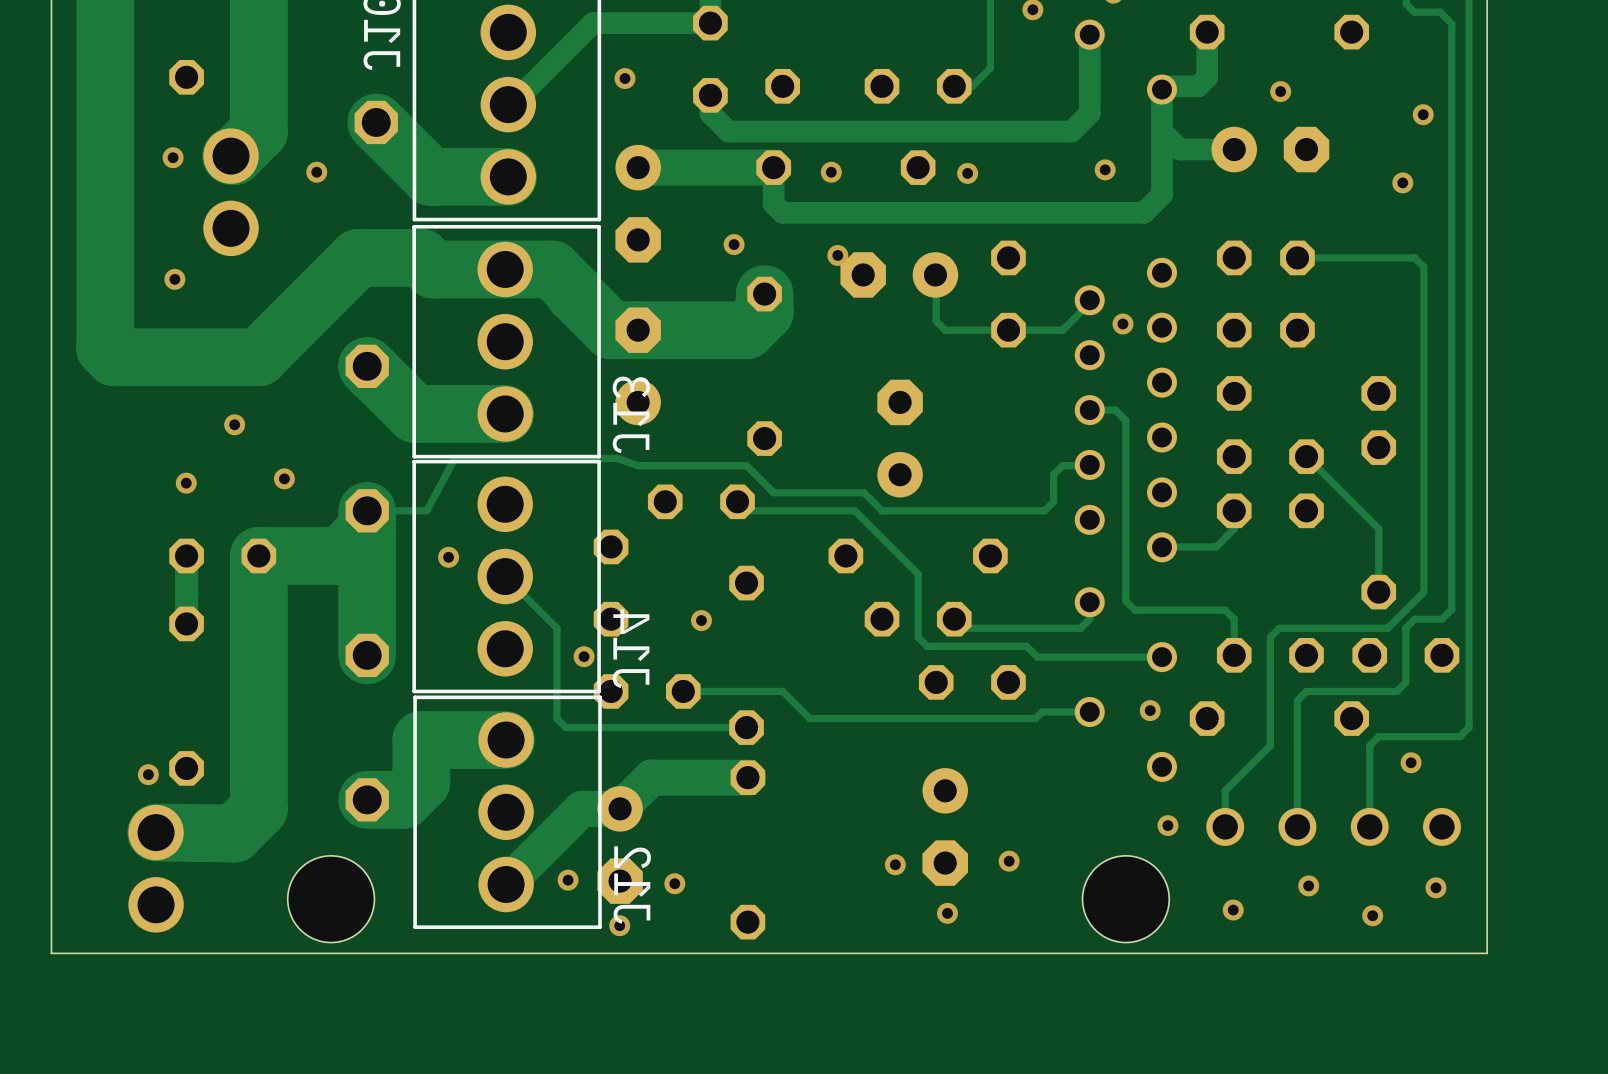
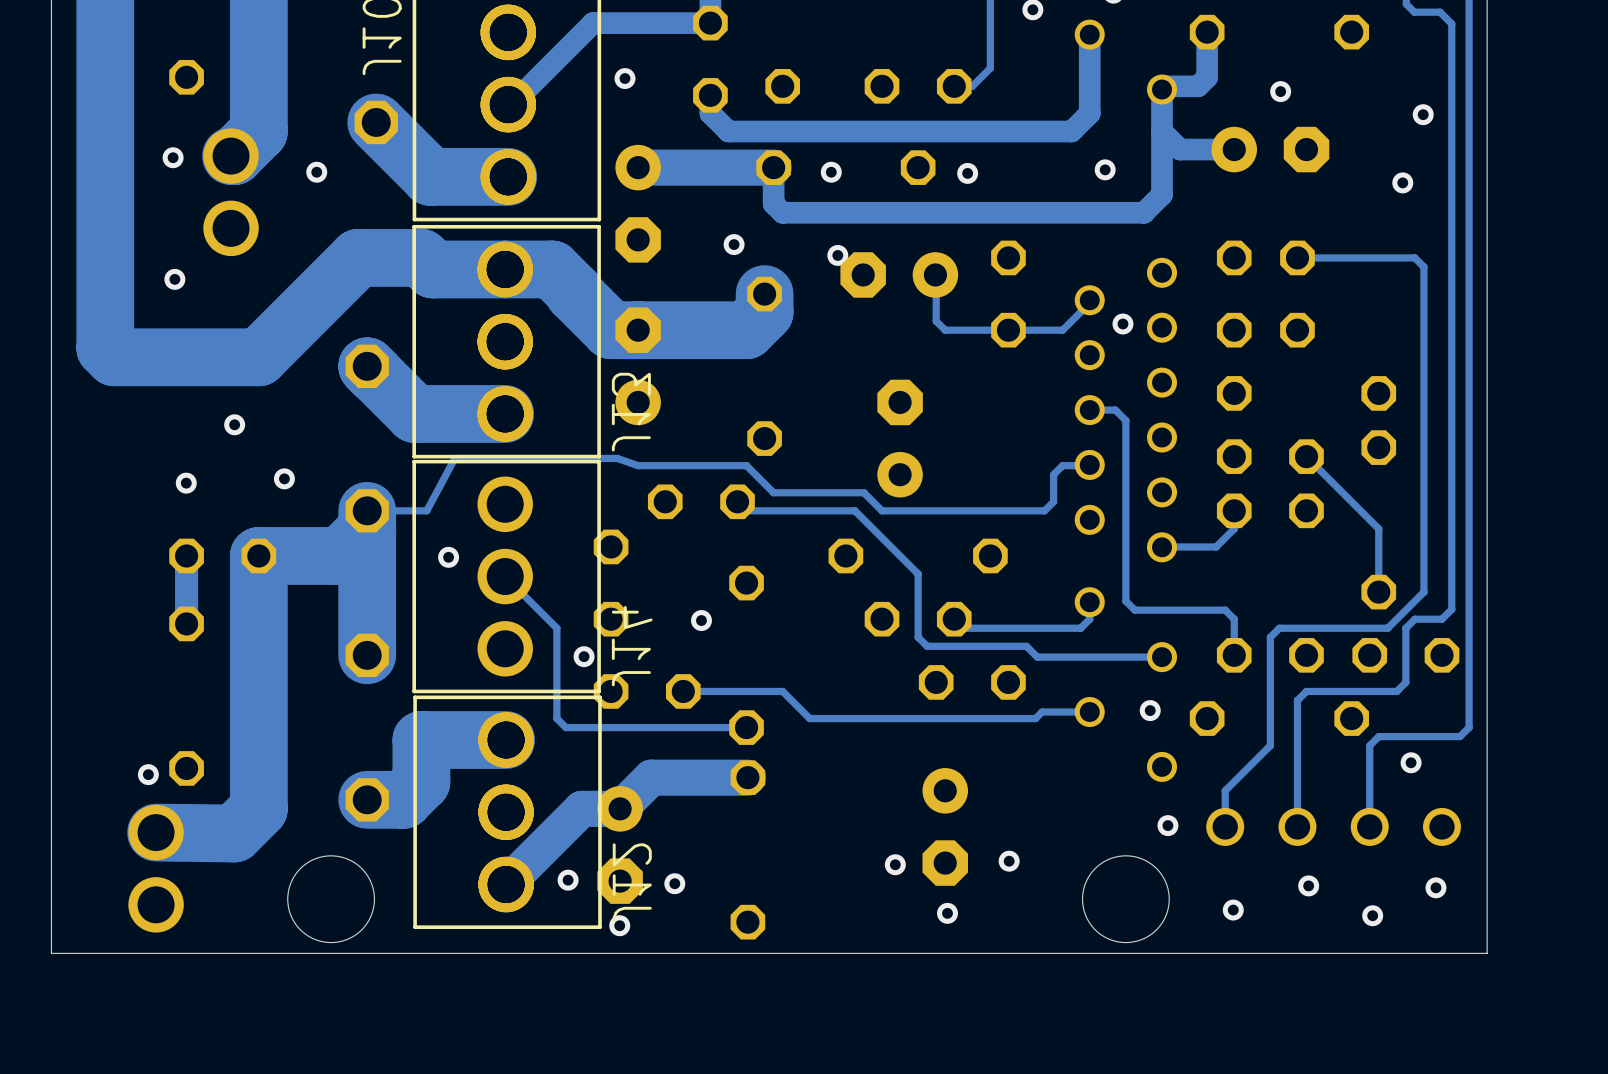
part: none -> (508, 104)
part: none -> (505, 341)
part: none -> (506, 812)

